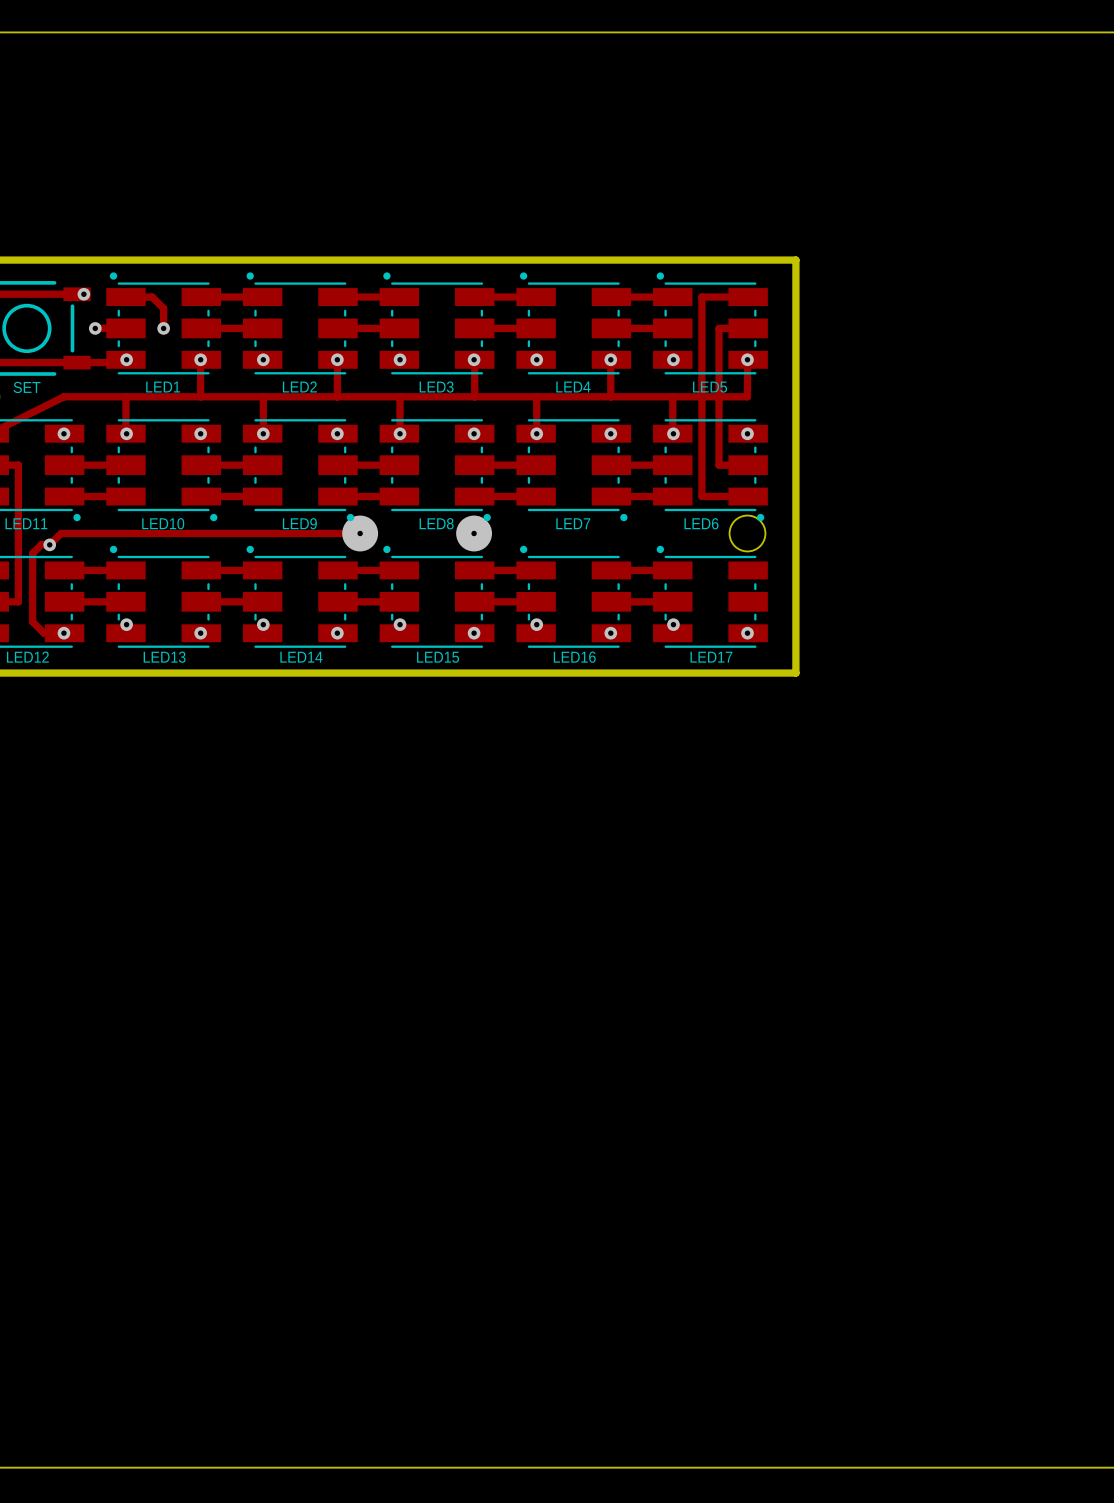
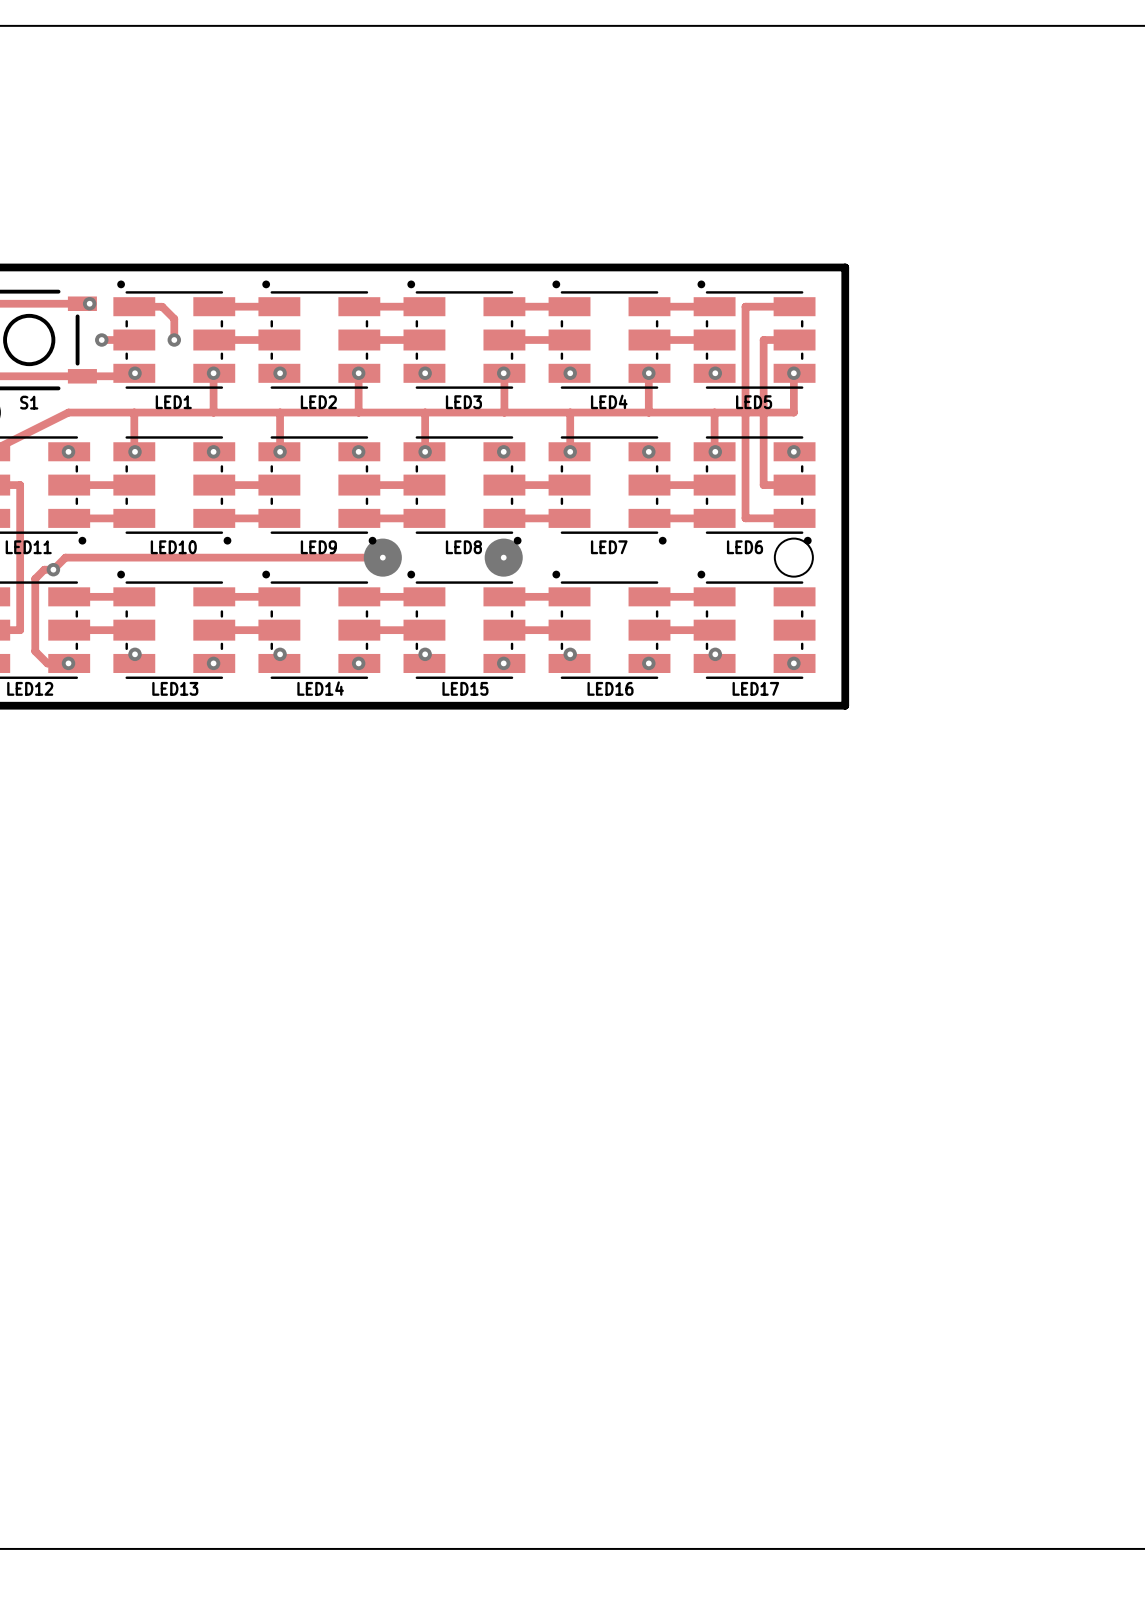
SET name: SET (27, 387) -> S1 (29, 402)

